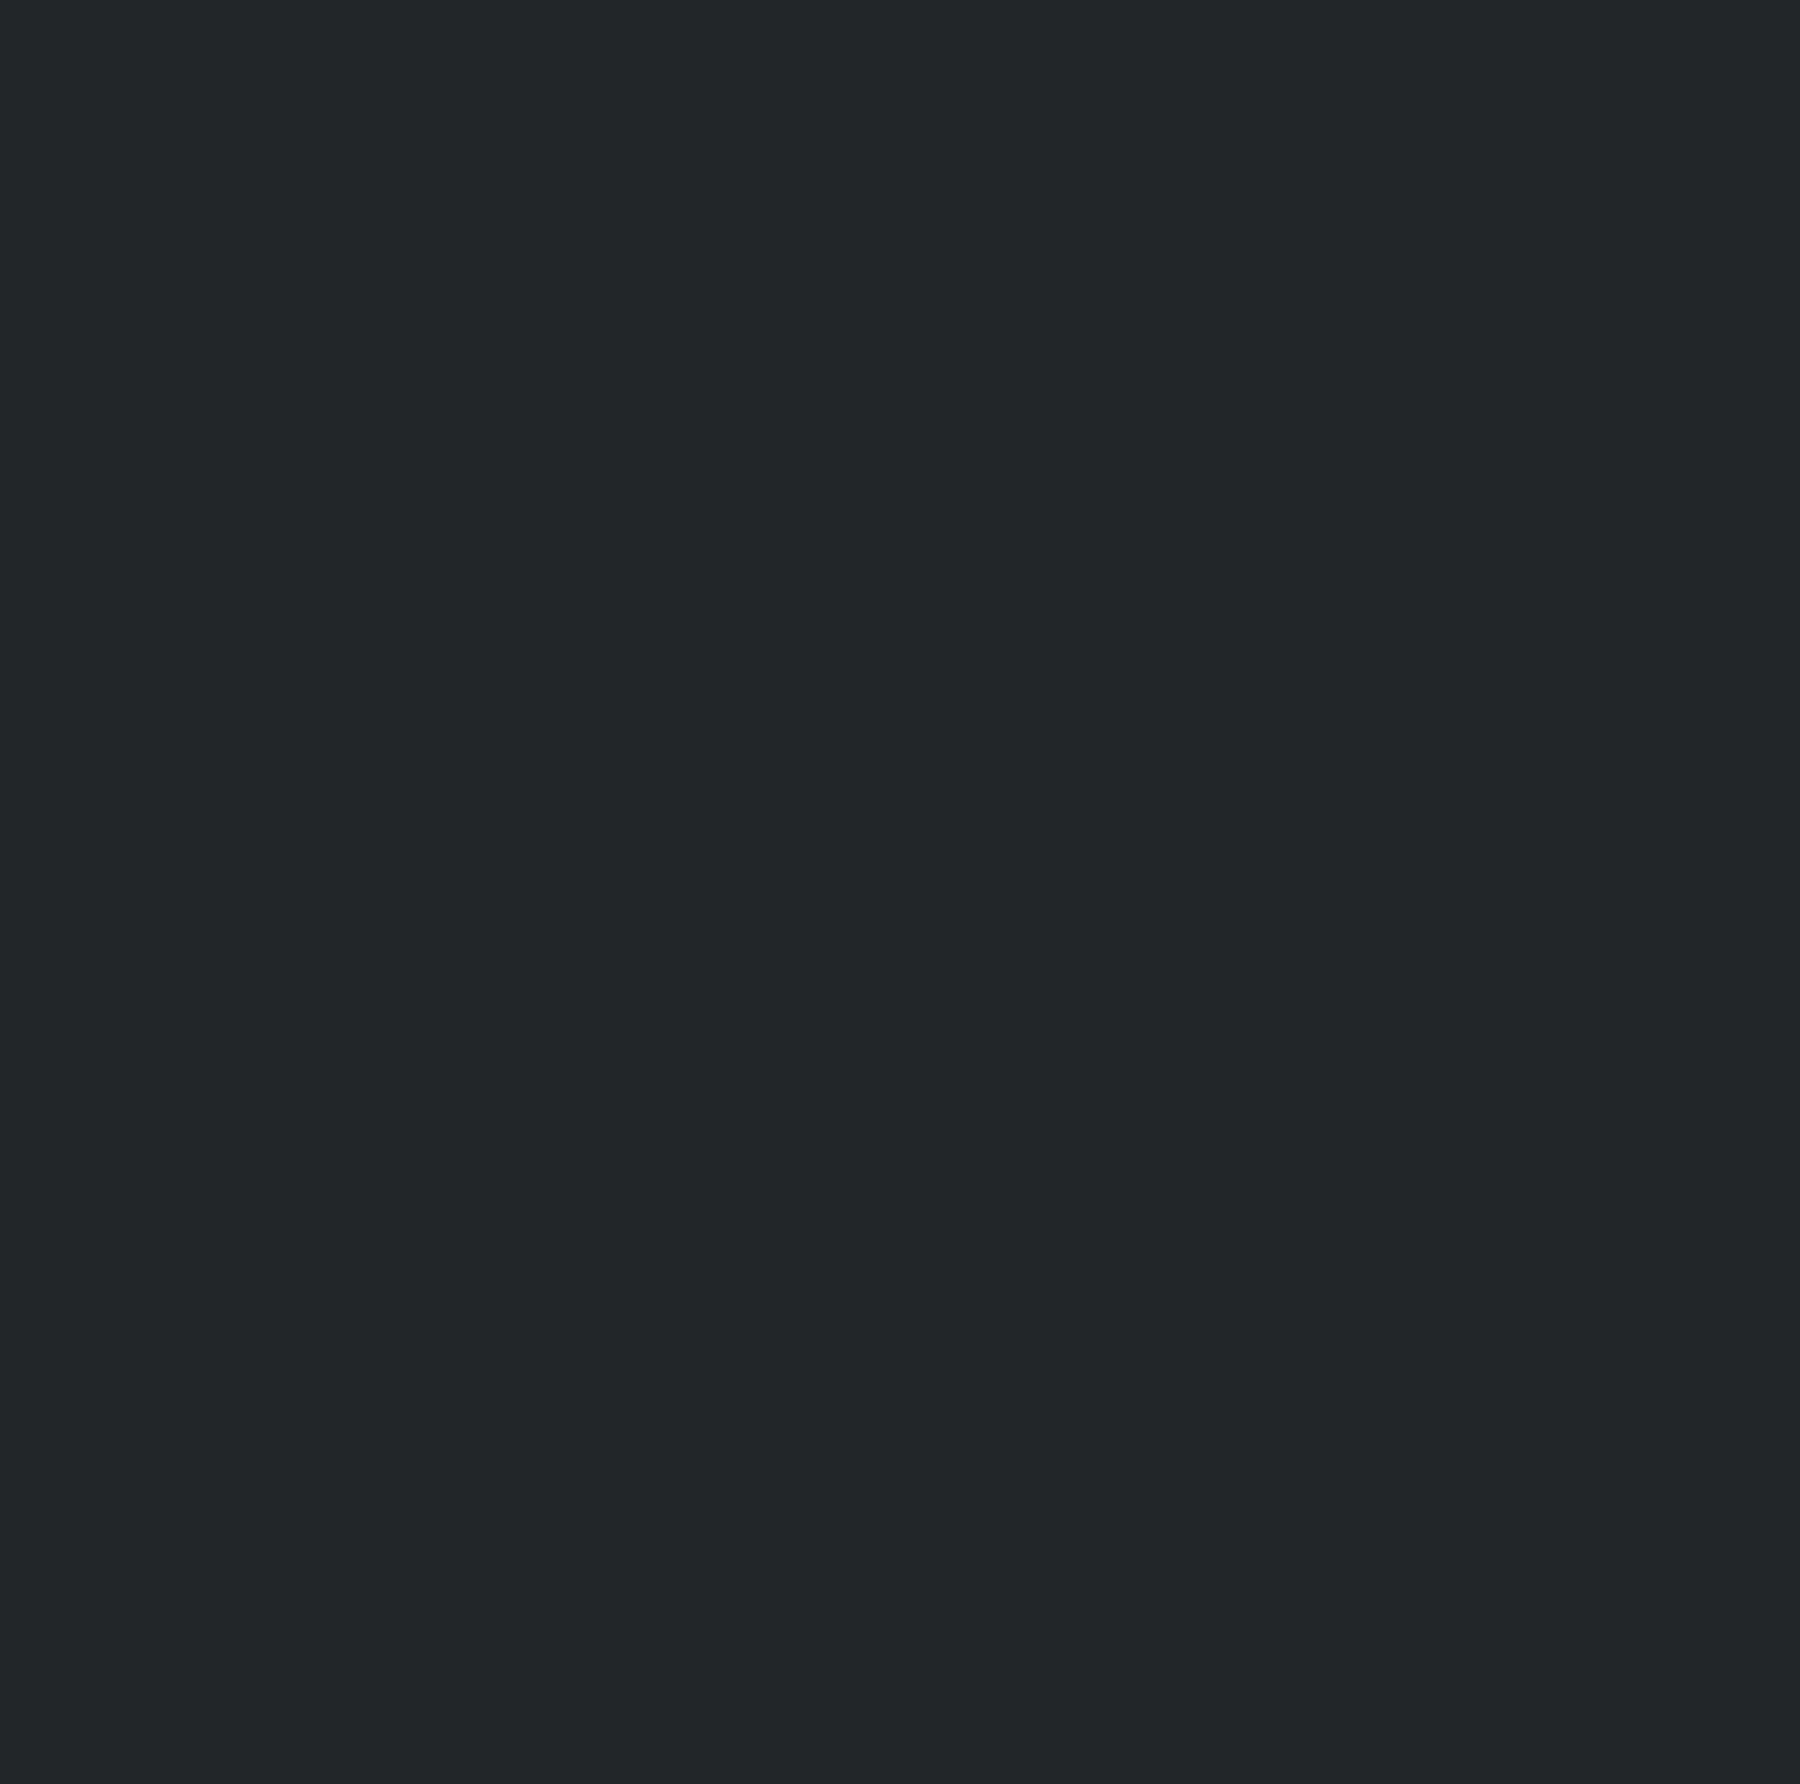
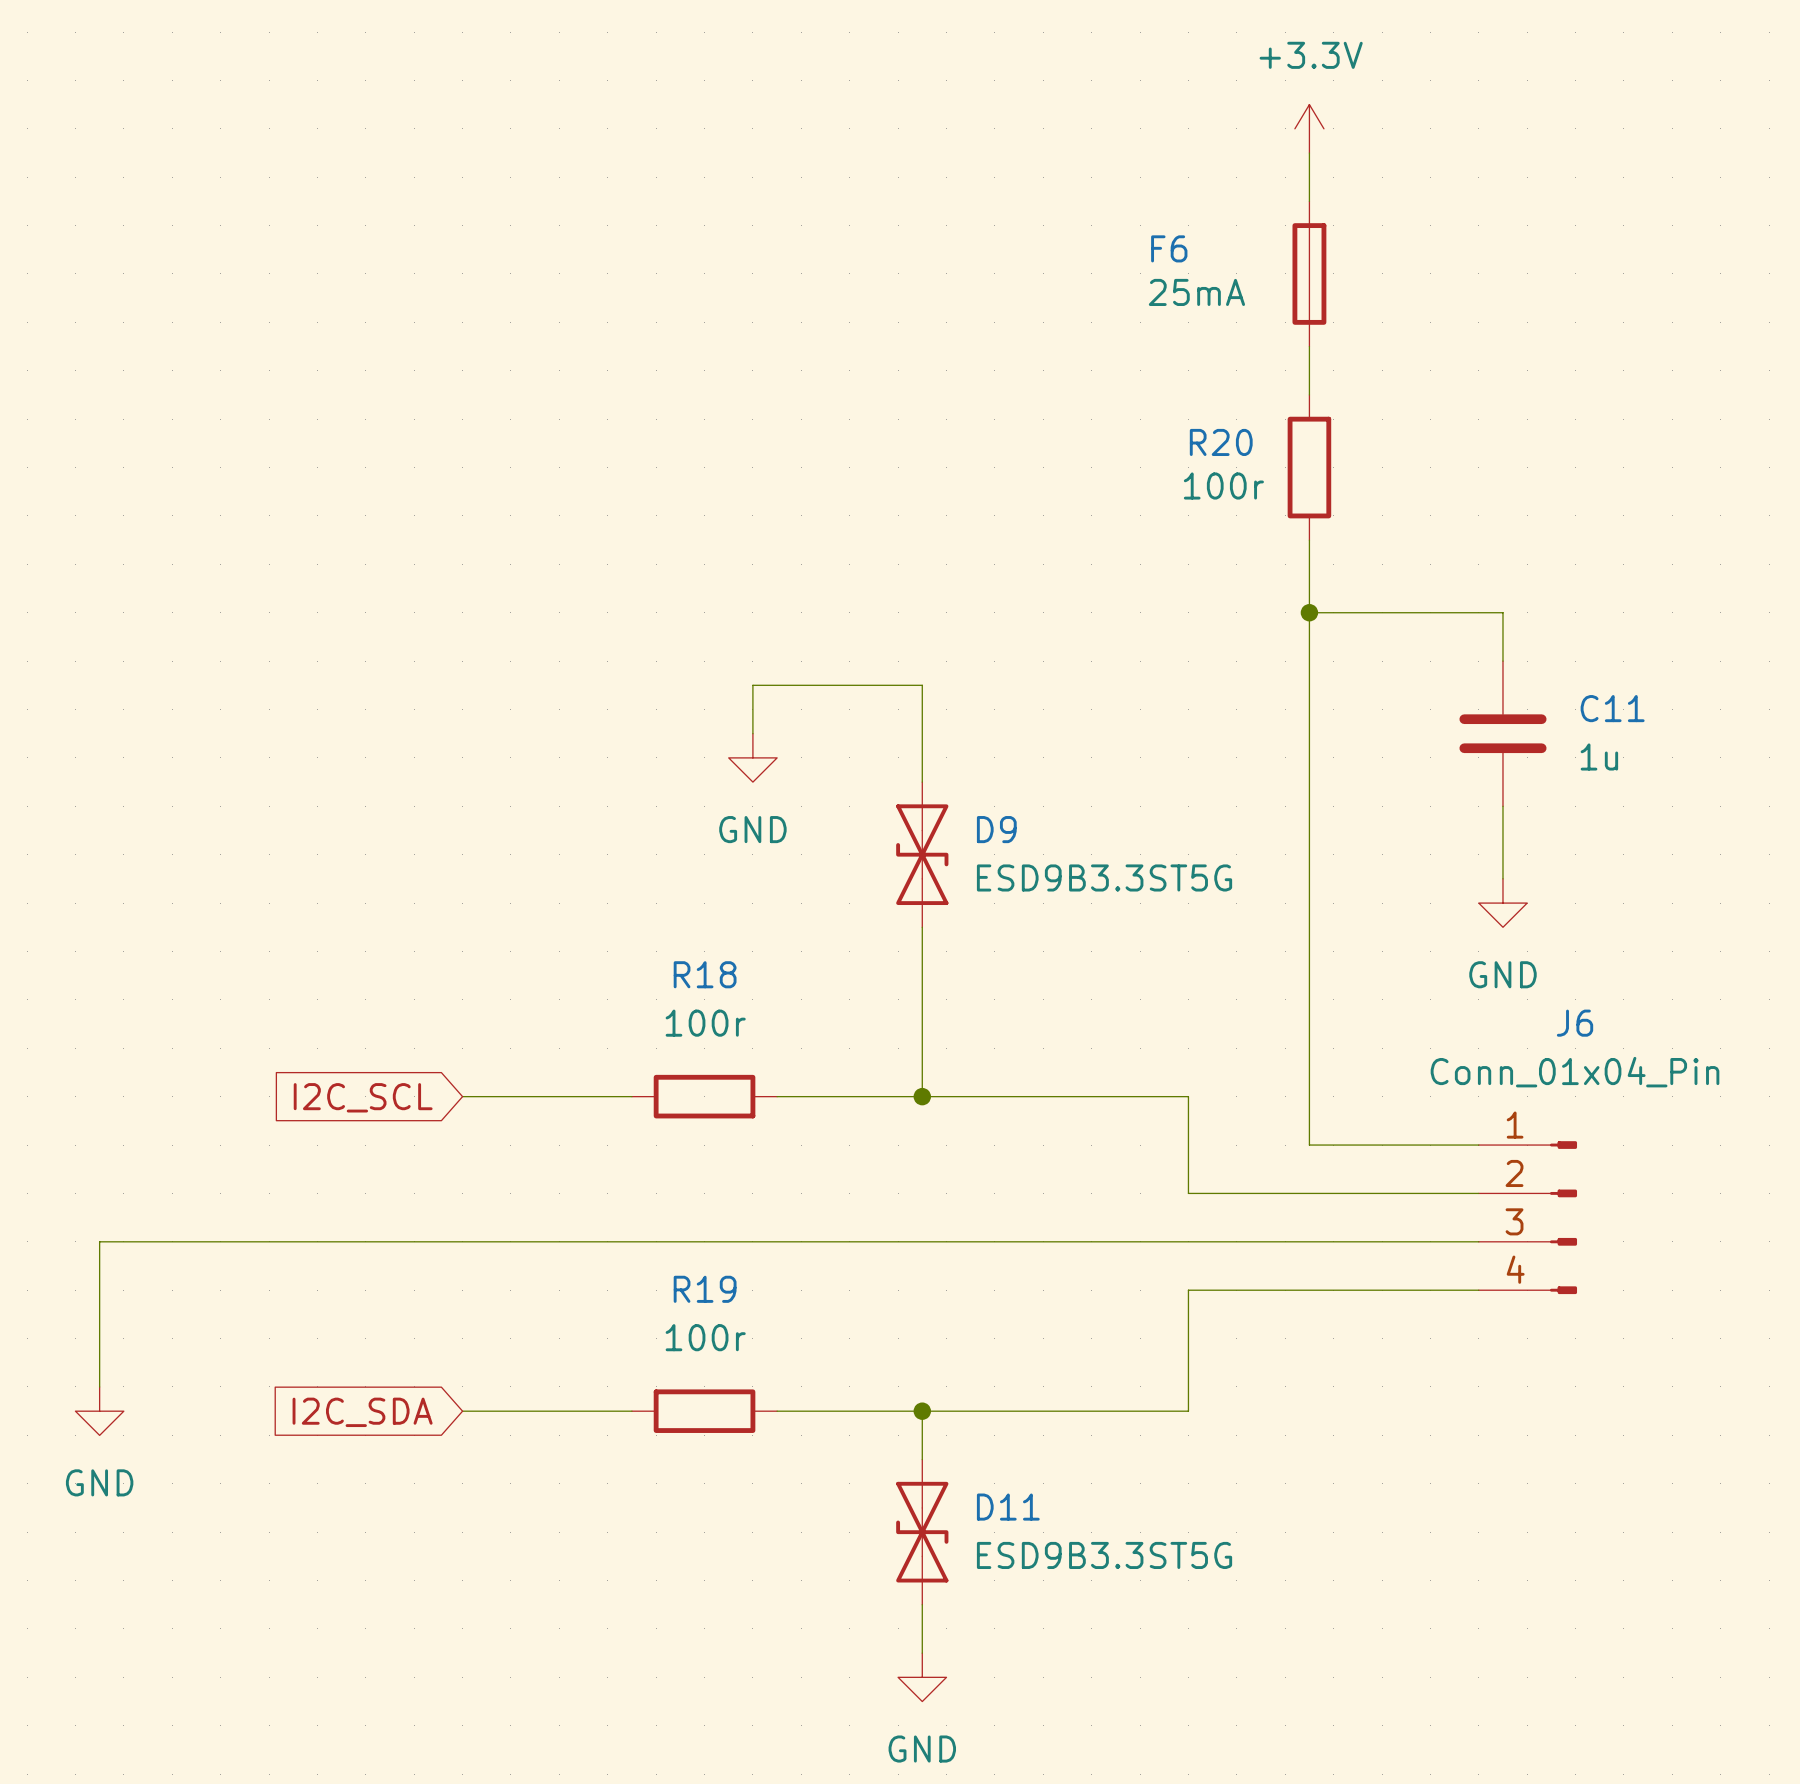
power symbol: none -> +3.3V (1309, 128)
wire: none -> (1309, 153) (1309, 201)
F6: none -> 25mA (1309, 273)
wire: none -> (1309, 346) (1309, 394)
R20: none -> 100r (1309, 467)
wire: none -> (1309, 540) (1309, 1145) (1478, 1145)
wire: none -> (1309, 612) (1502, 612) (1502, 661)
junction: none -> (1309, 612)
wire: none -> (752, 733) (752, 685) (922, 685) (922, 782)
C11: none -> 1u (1502, 733)
power symbol: none -> GND (752, 757)
wire: none -> (1502, 806) (1502, 878)
D9: none -> ESD9B3.3ST5G (922, 854)
power symbol: none -> GND (1502, 903)
wire: none -> (922, 927) (922, 1096)
wire: none -> (462, 1096) (631, 1096)
R18: none -> 100r (704, 1096)
wire: none -> (777, 1096) (1188, 1096) (1188, 1193) (1478, 1193)
junction: none -> (922, 1096)
global label: none -> I2C_SCL (363, 1097)
J6: none -> Conn_01x04_Pin (1527, 1217)
wire: none -> (1478, 1241) (99, 1241) (99, 1386)
wire: none -> (1478, 1290) (1188, 1290) (1188, 1411) (777, 1411)
power symbol: none -> GND (99, 1411)
wire: none -> (462, 1411) (631, 1411)
R19: none -> 100r (704, 1411)
wire: none -> (922, 1411) (922, 1459)
junction: none -> (922, 1411)
global label: none -> I2C_SDA (362, 1412)
D11: none -> ESD9B3.3ST5G (922, 1532)
wire: none -> (922, 1604) (922, 1653)
power symbol: none -> GND (922, 1677)

